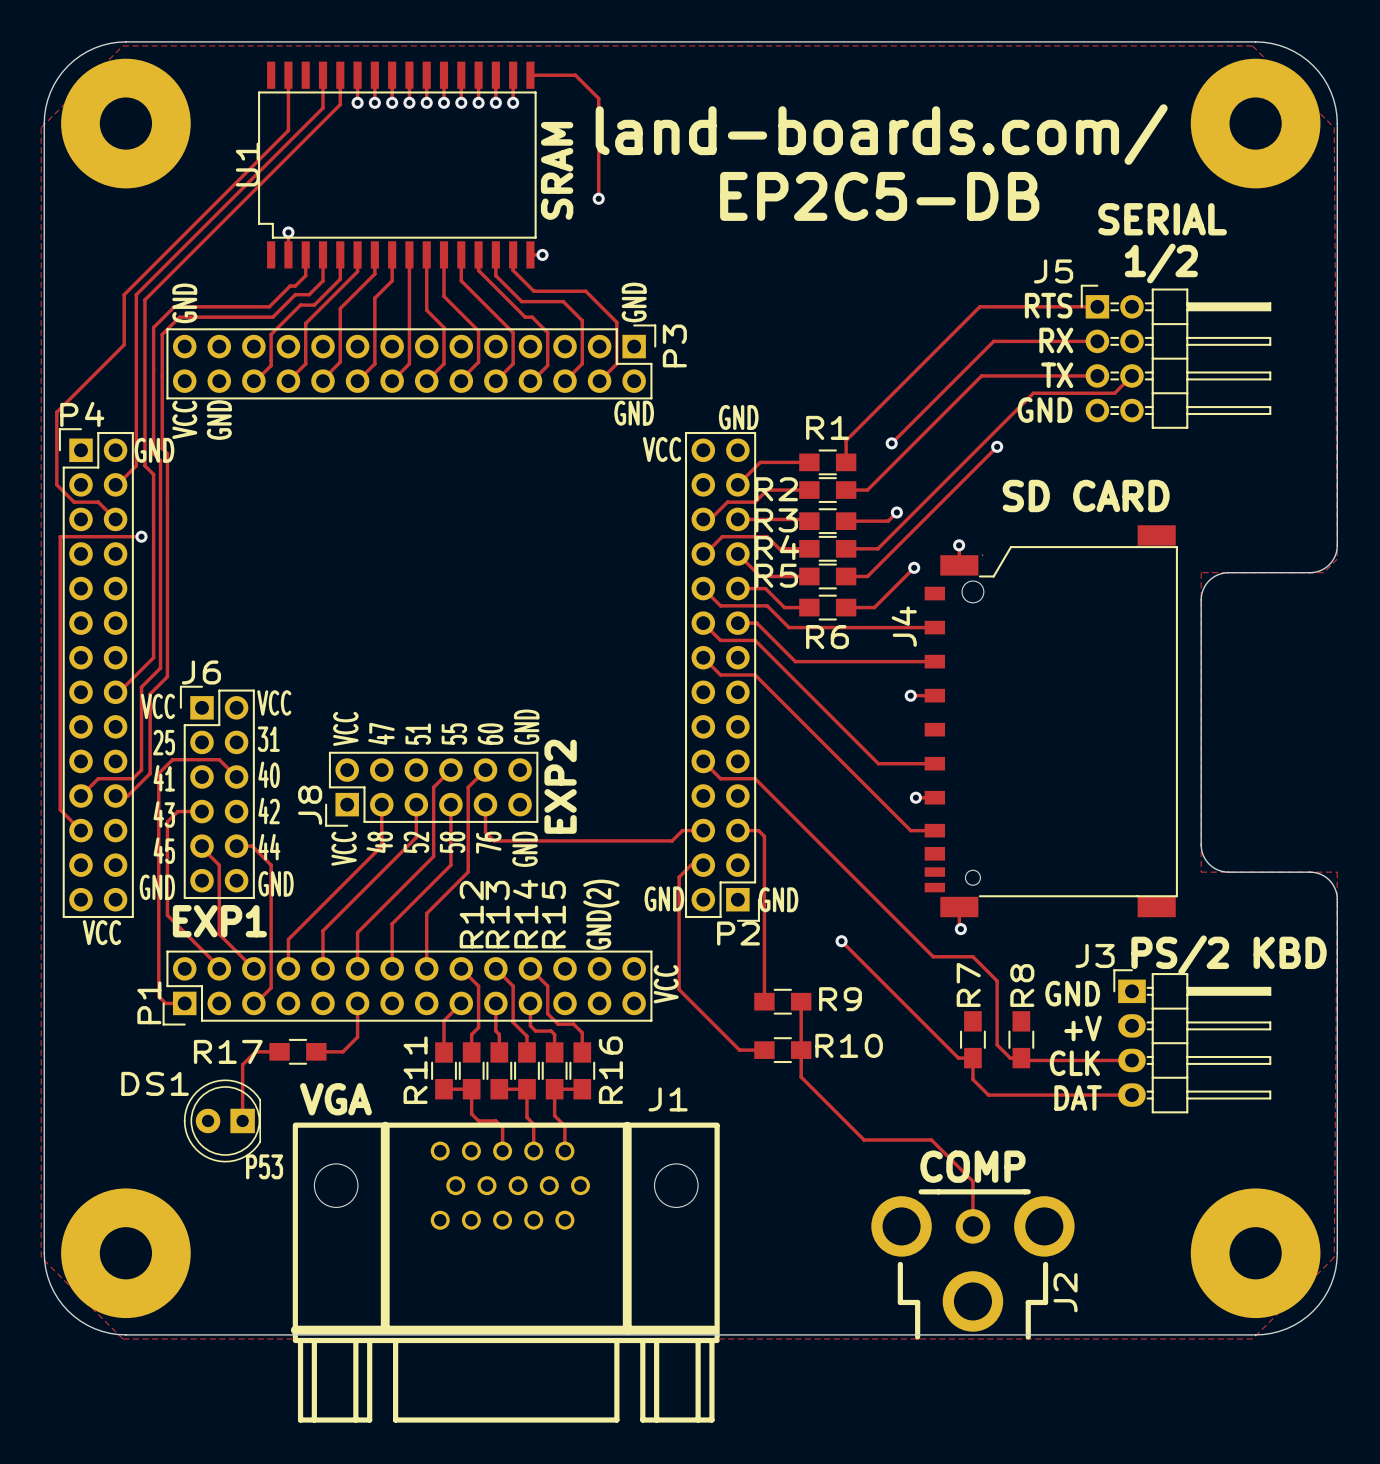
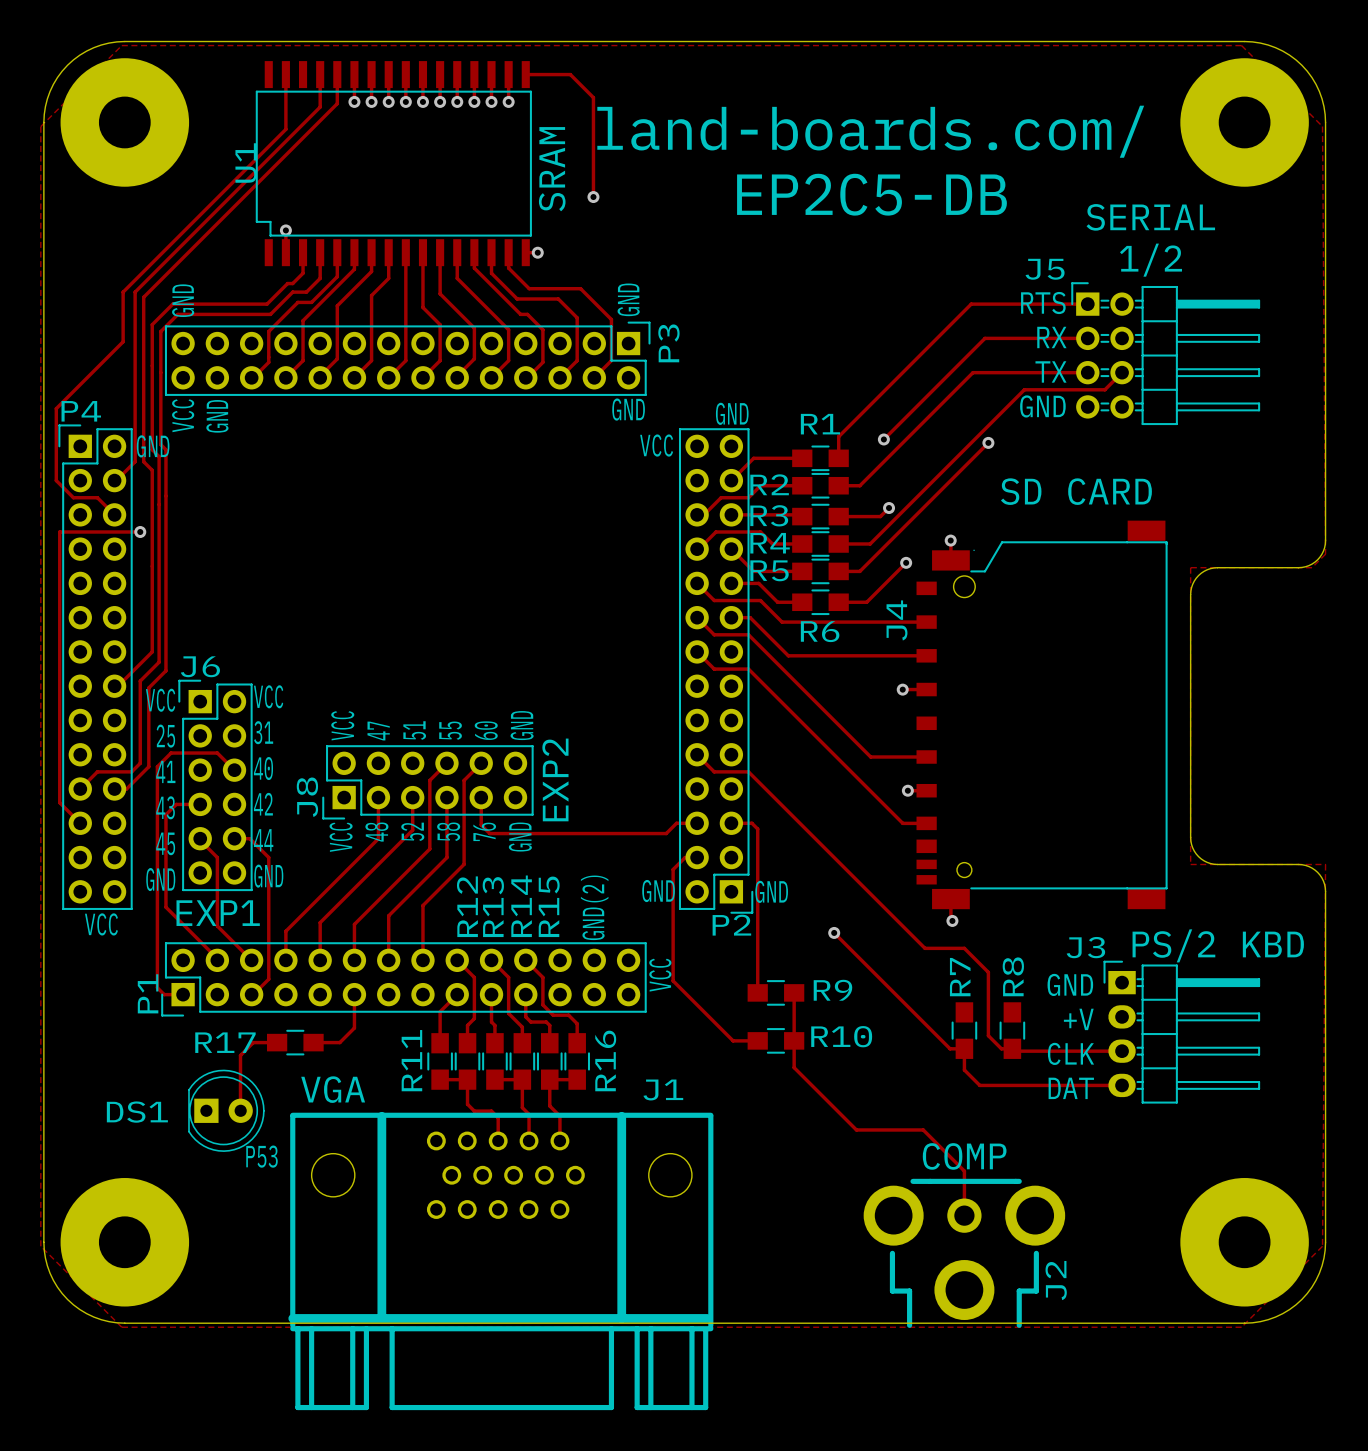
DS1 footprint: [183, 1079, 262, 1163] -> [188, 1069, 265, 1152]
DS1 name position: DS1 (155, 1083) -> DS1 (137, 1112)

